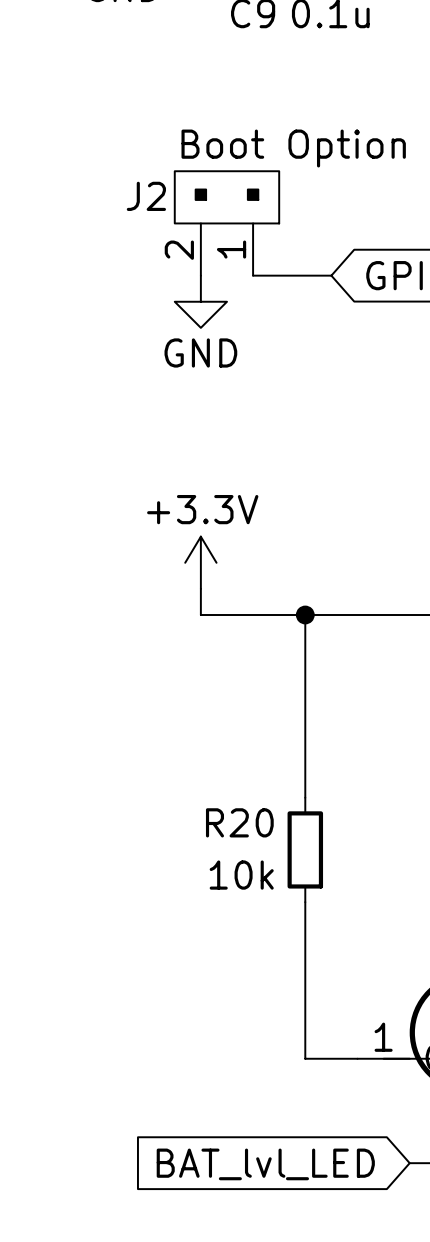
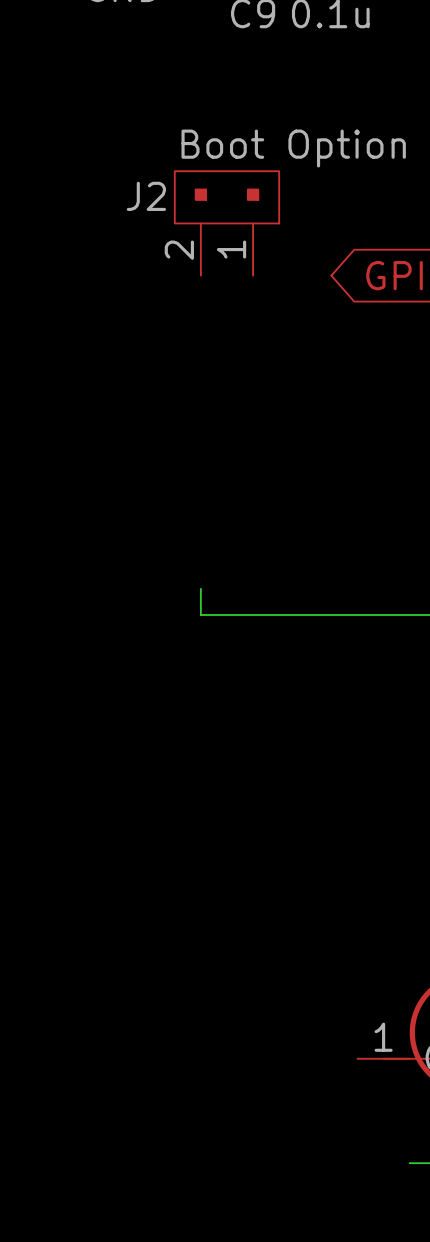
wire: (253, 275) (331, 275) -> none
power symbol: GND (200, 301) -> none
power symbol: +3.3V (200, 562) -> none
wire: (305, 615) (305, 797) -> none
junction: (305, 615) -> none
R20: 10k (305, 849) -> none
wire: (305, 902) (305, 1058) (357, 1058) -> none
global label: BAT_lvl_LED (265, 1164) -> none

